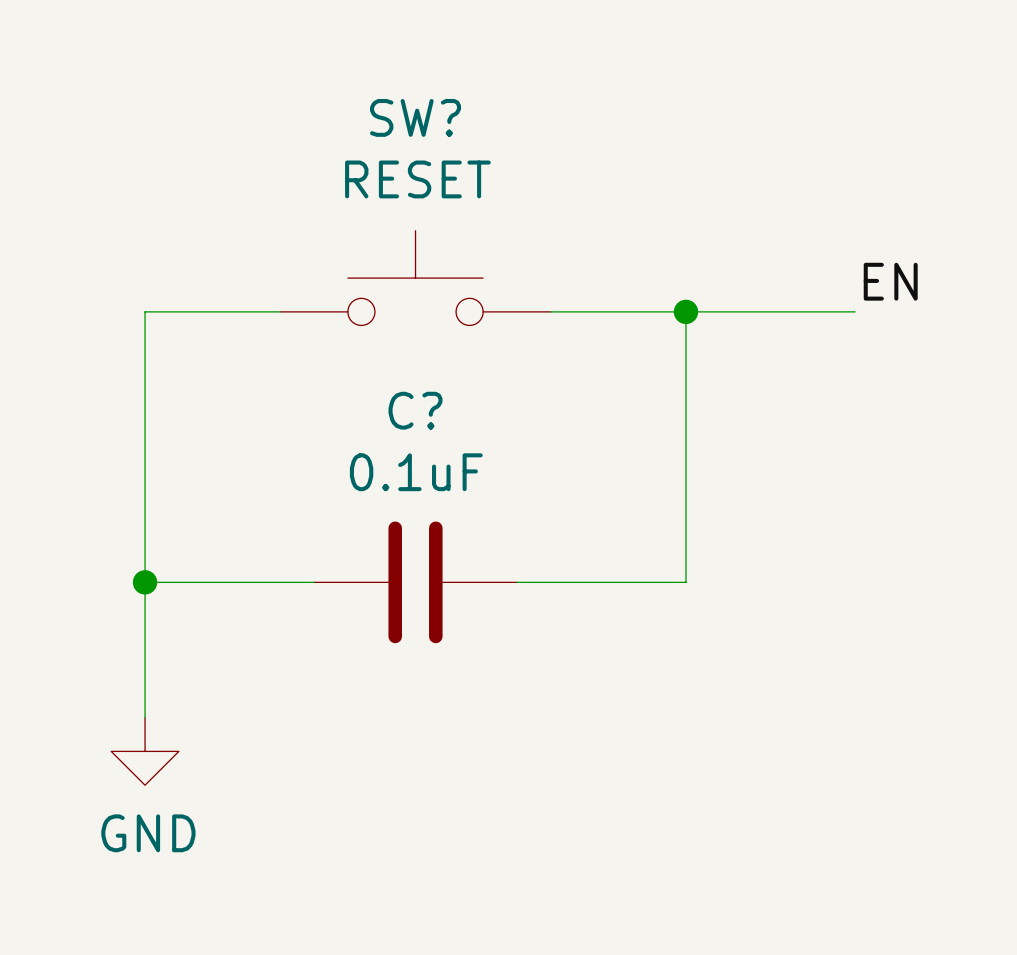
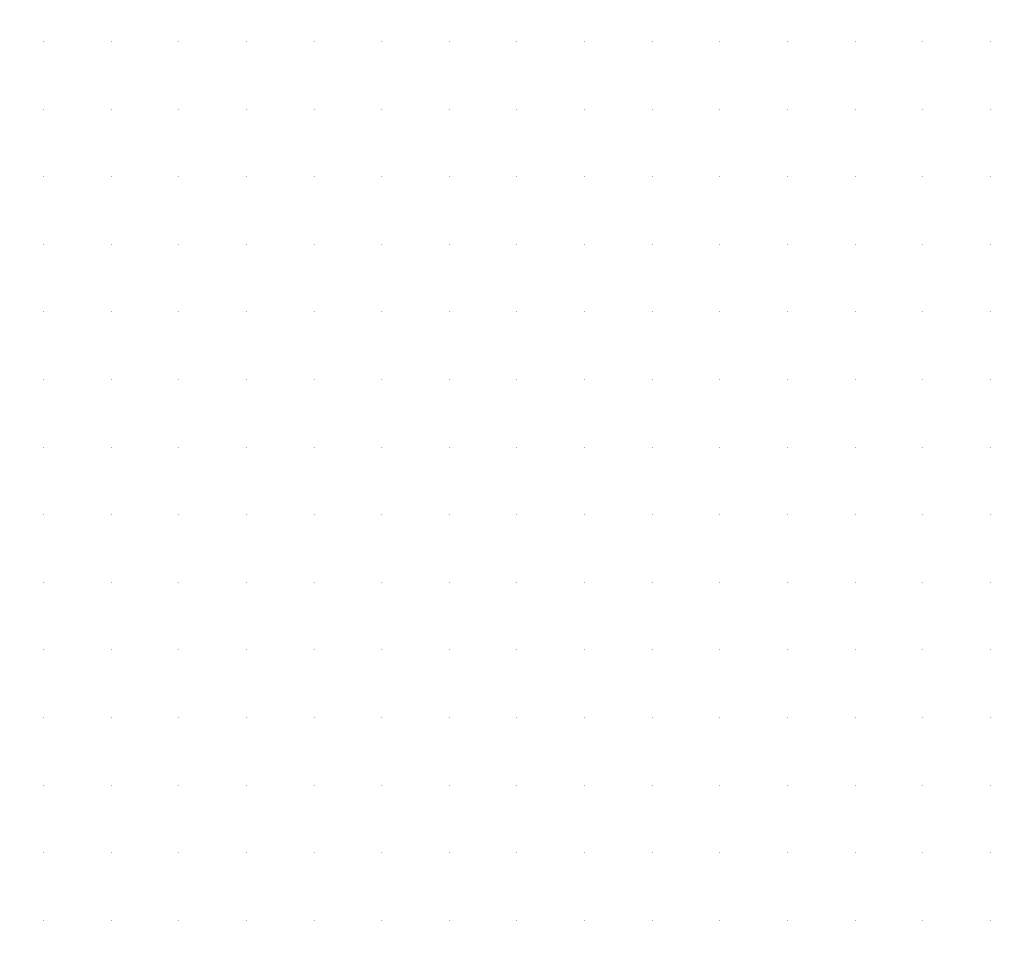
SW?: RESET (415, 278) -> none
label: EN (890, 281) -> none
wire: (280, 311) (145, 311) (145, 717) -> none
wire: (550, 311) (855, 311) -> none
wire: (685, 311) (685, 582) (516, 582) -> none
junction: (685, 311) -> none
wire: (145, 582) (314, 582) -> none
junction: (145, 582) -> none
C?: 0.1uF (415, 582) -> none
power symbol: GND (145, 751) -> none

